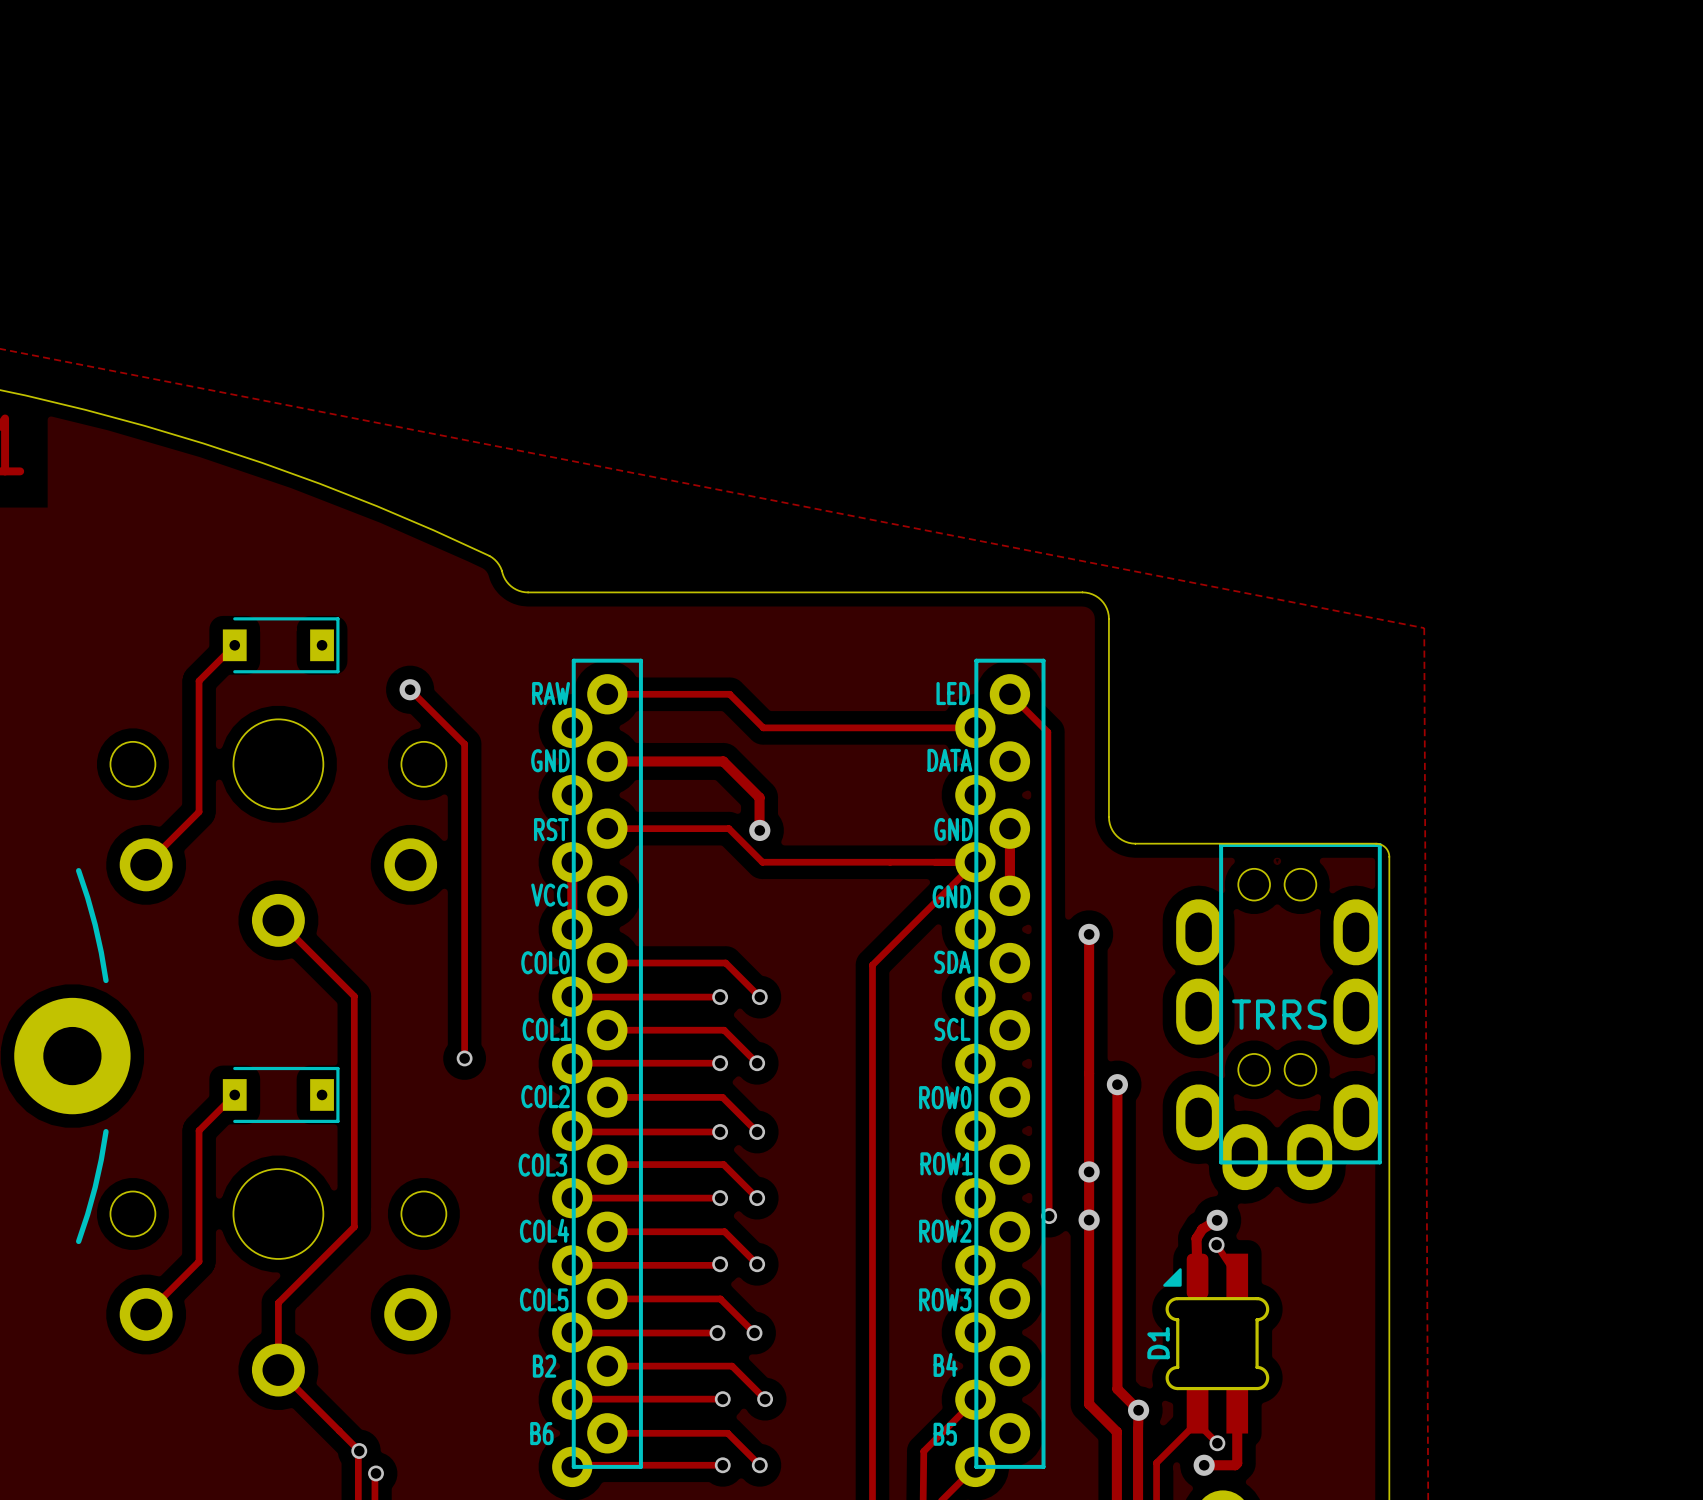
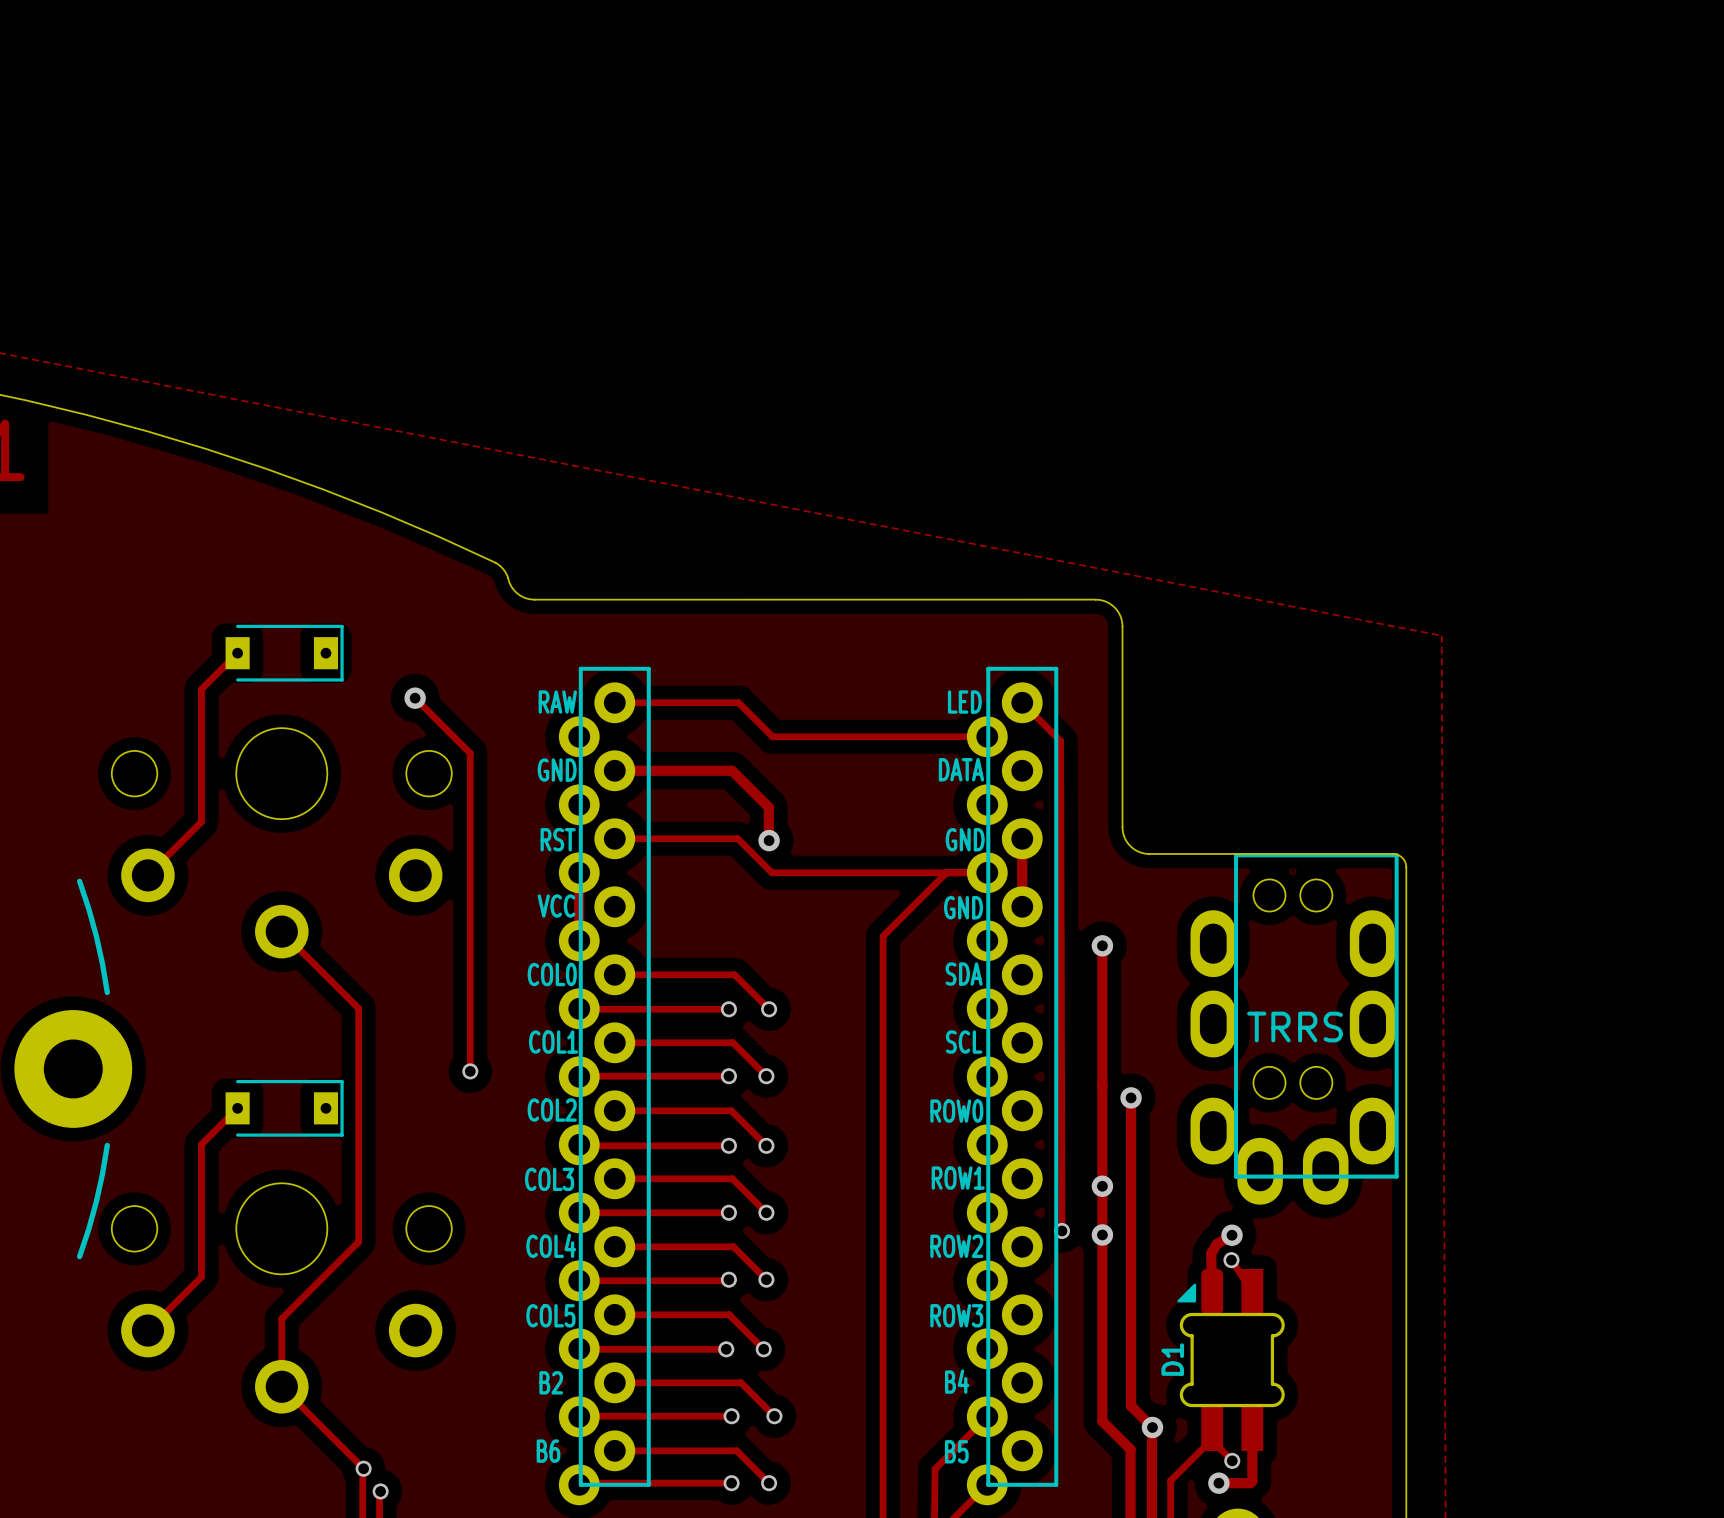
track: (975, 862) (872, 965) -> (946, 872) (883, 936) (883, 976)

